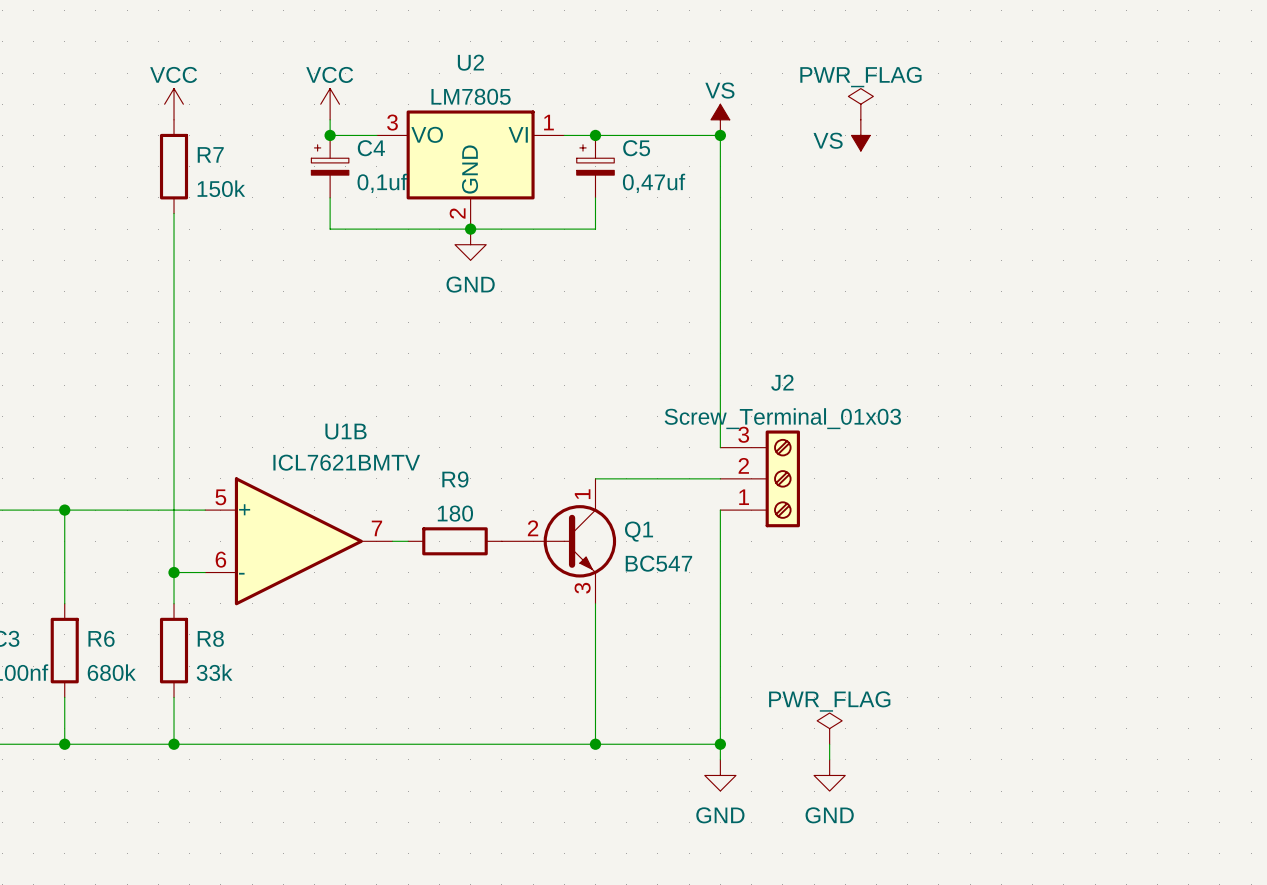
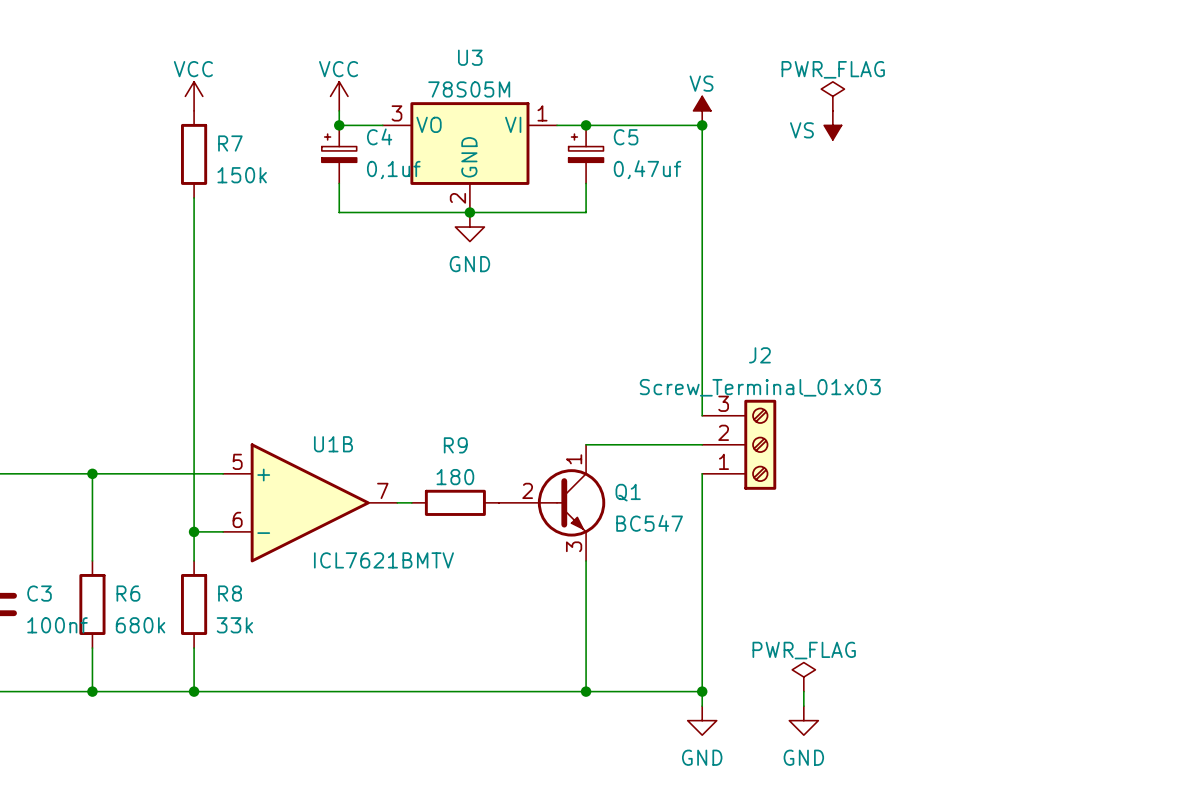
U2 name: U2 (470, 62) -> U3 (470, 57)
U2 value: LM7805 (471, 96) -> 78S05M (469, 89)
U1B name position: U1B (346, 431) -> U1B (333, 444)
U1B value position: ICL7621BMTV (346, 462) -> ICL7621BMTV (383, 560)

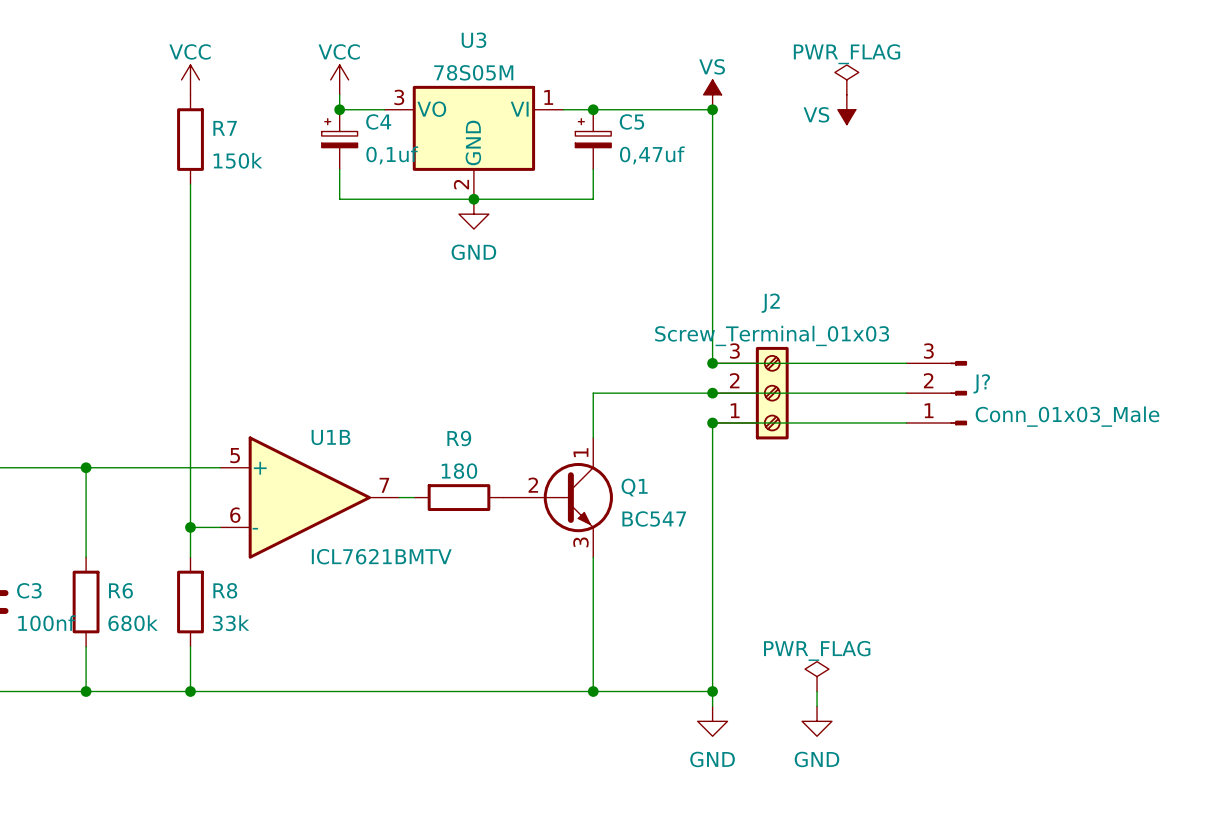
wire: (702, 372) (702, 415) -> (712, 363) (906, 363)
junction: none -> (712, 363)
junction: none -> (712, 393)
J?: none -> Conn_01x03_Male (936, 393)
junction: none -> (712, 423)
wire: none -> (906, 423) (712, 423) (712, 467)
wire: (586, 444) (702, 444) -> (593, 437) (593, 393) (906, 393)
J2 position: (739, 444) -> (750, 393)

